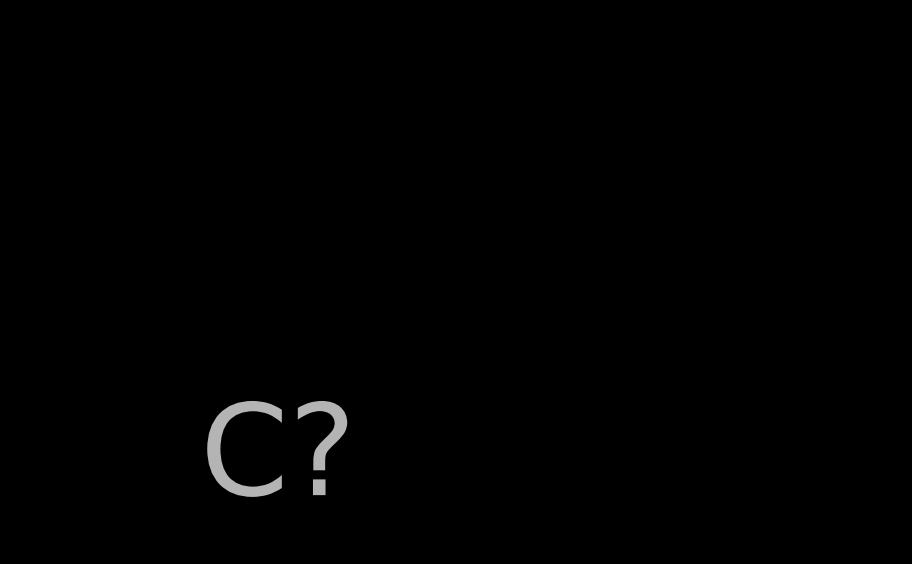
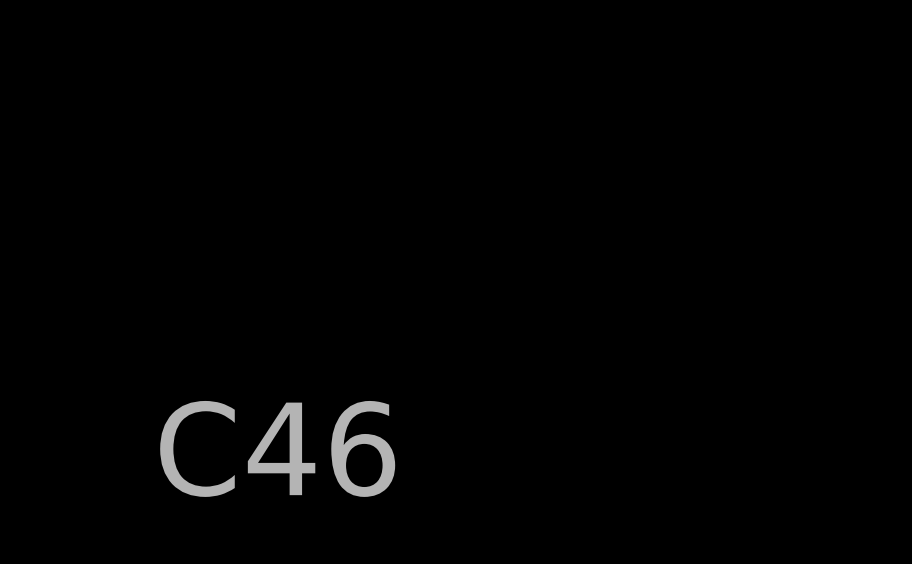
C? name: C? (277, 448) -> C46 (277, 448)

